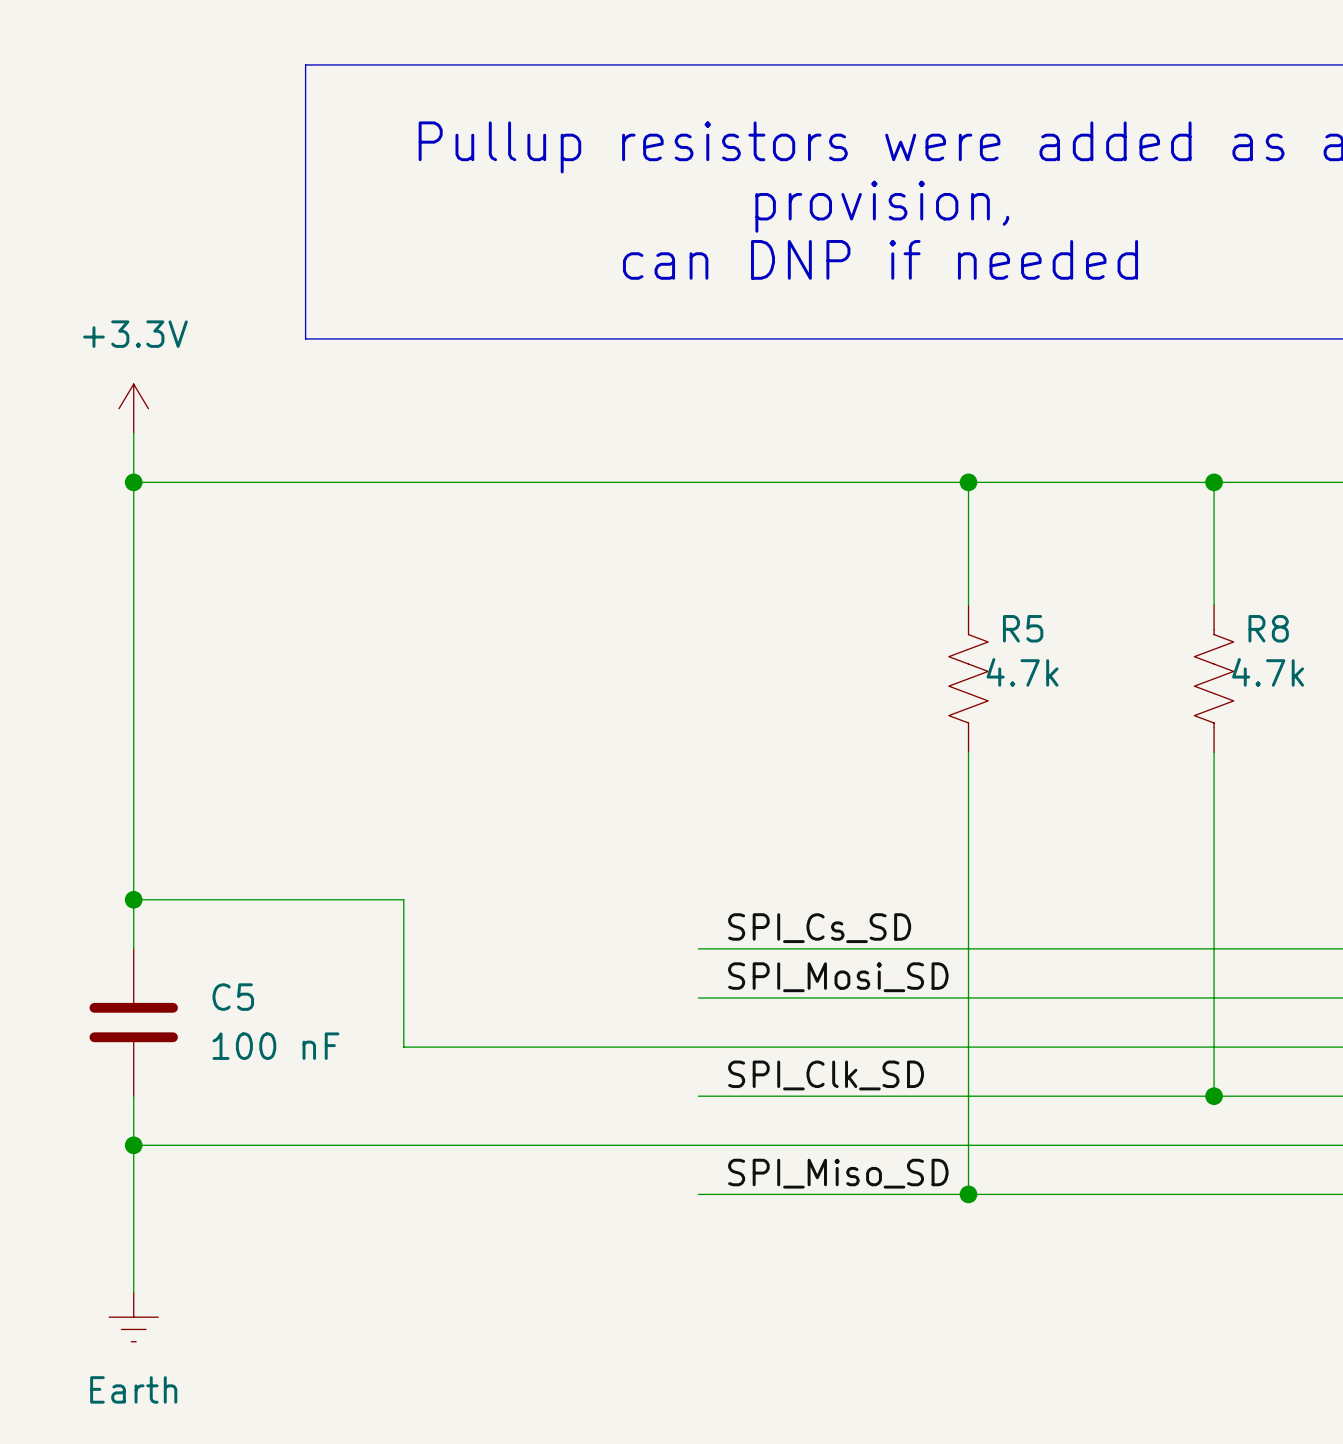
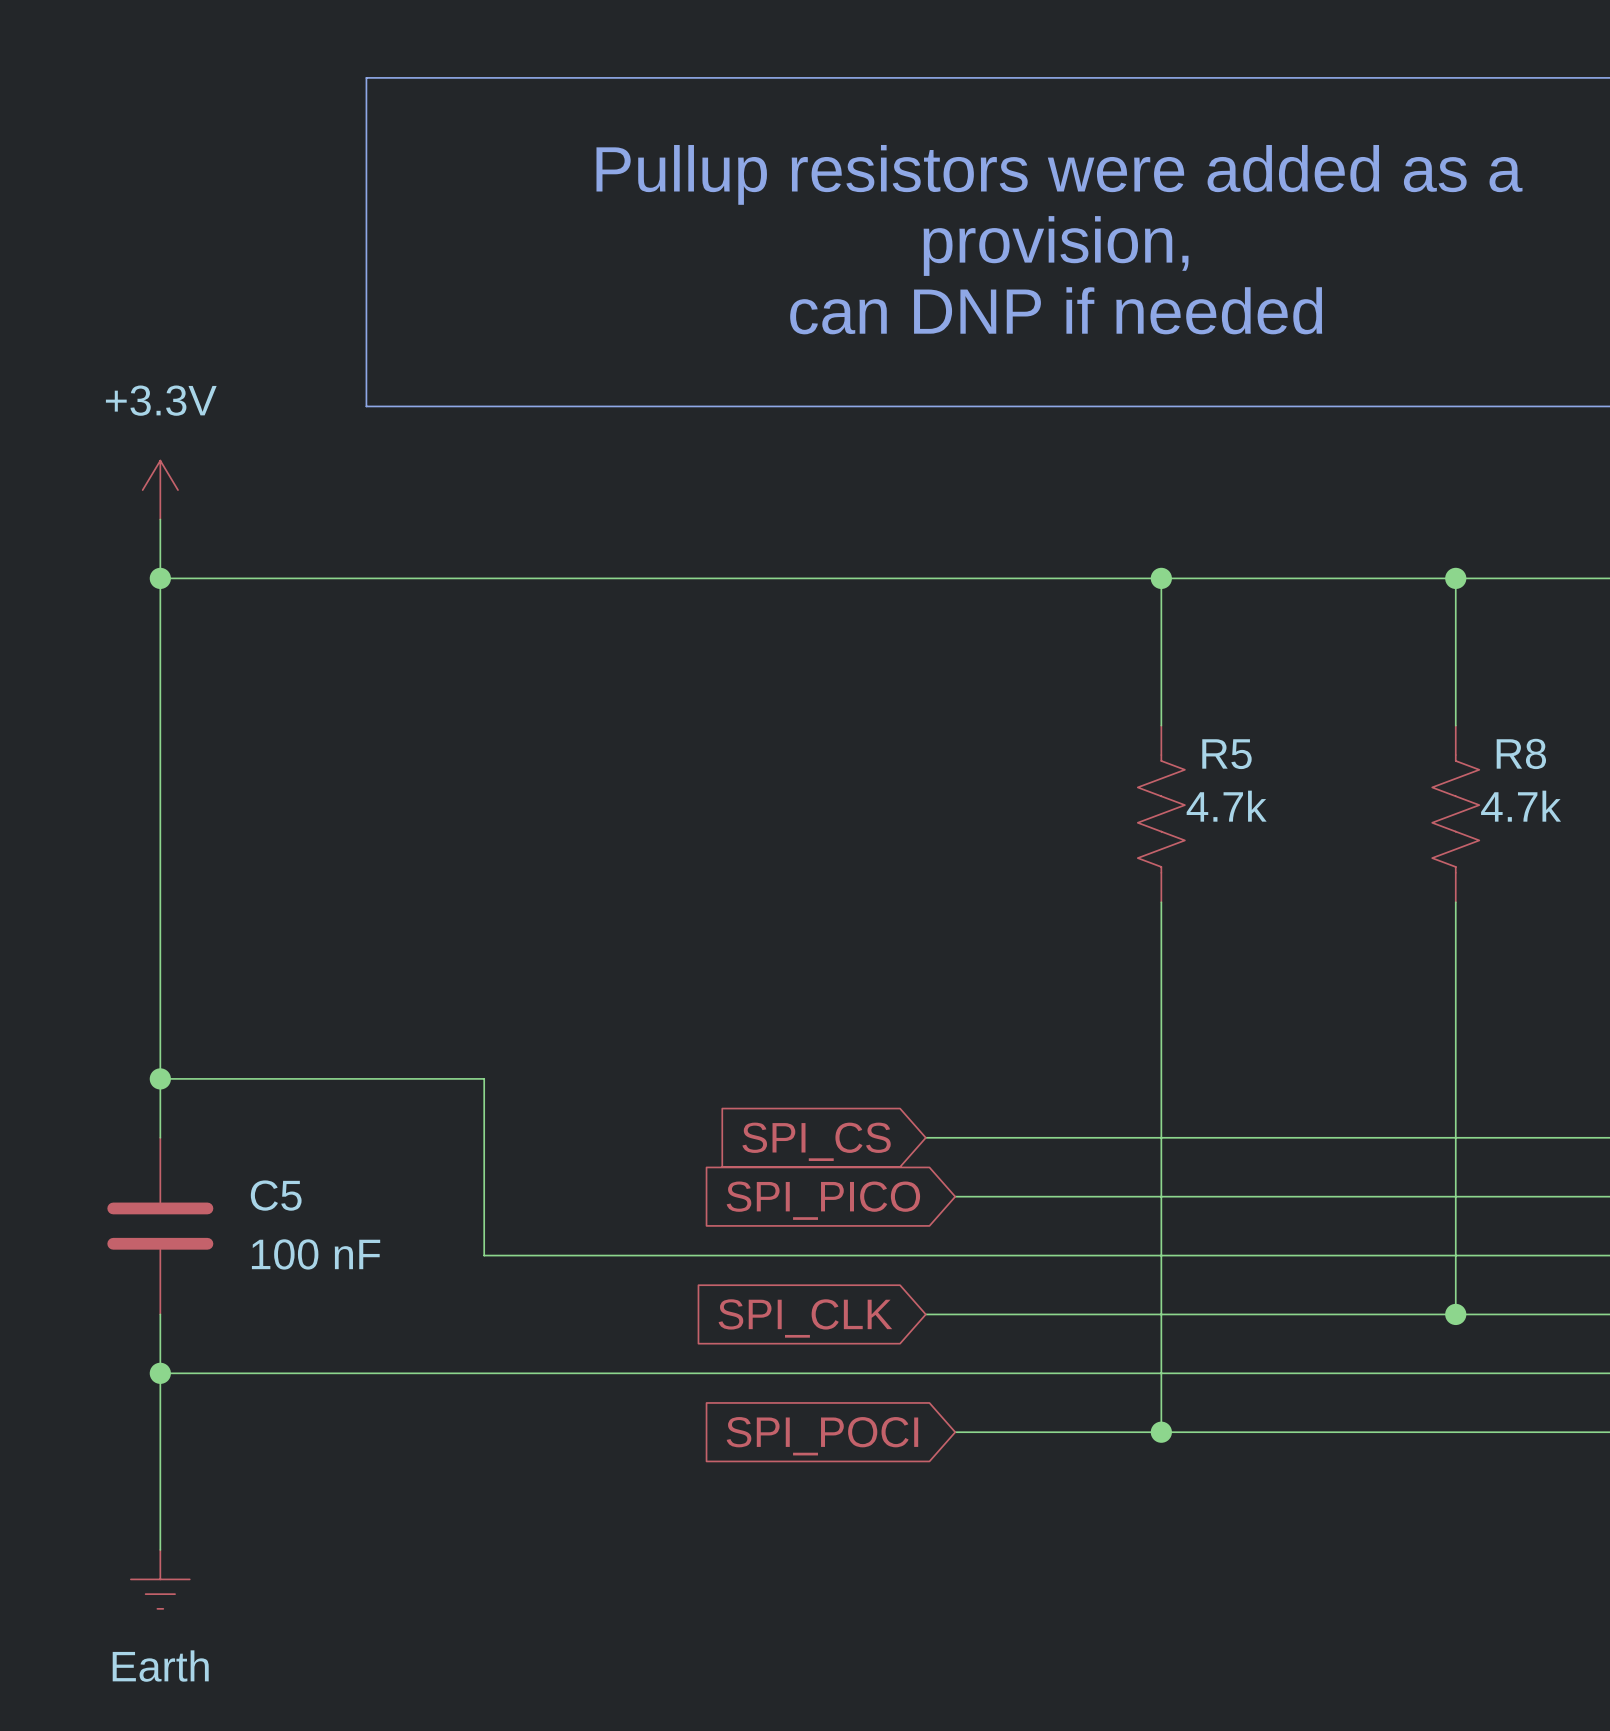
label: SPI_Cs_SD (819, 928) -> none
wire: (698, 948) (772, 948) -> none
global label: none -> SPI_CS (816, 1141)
label: SPI_Mosi_SD (838, 977) -> none
wire: (698, 997) (796, 997) -> none
global label: none -> SPI_PICO (823, 1200)
label: SPI_Clk_SD (826, 1075) -> none
wire: (698, 1096) (772, 1096) -> none
global label: none -> SPI_CLK (805, 1318)
label: SPI_Miso_SD (838, 1173) -> none
wire: (698, 1194) (796, 1194) -> none
global label: none -> SPI_POCI (822, 1436)

